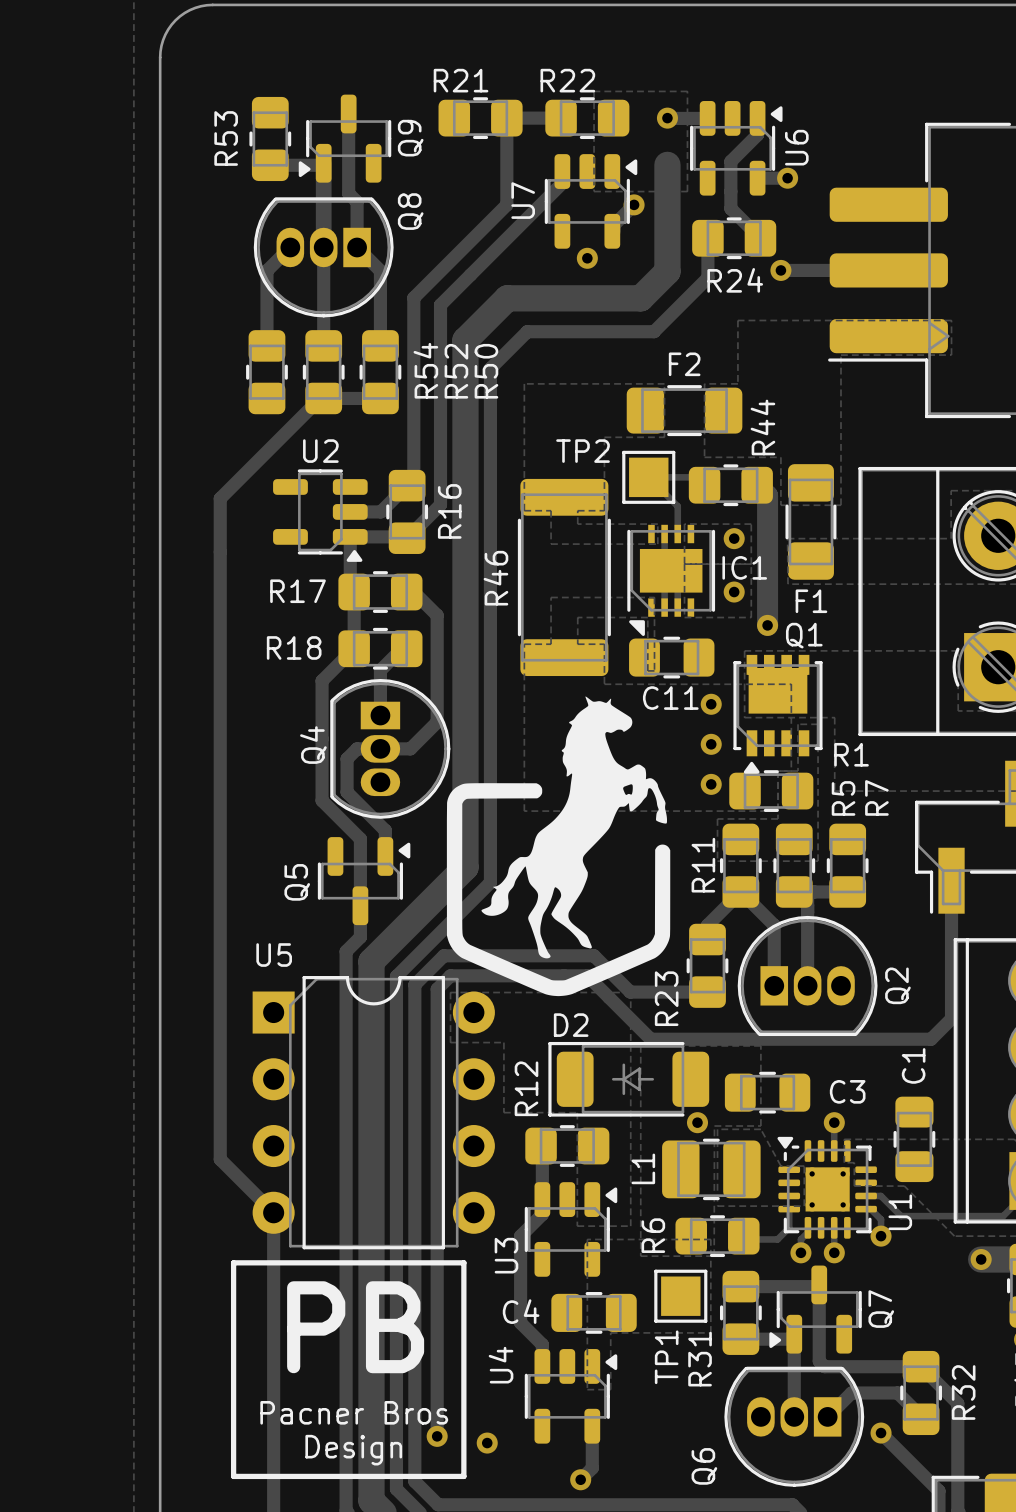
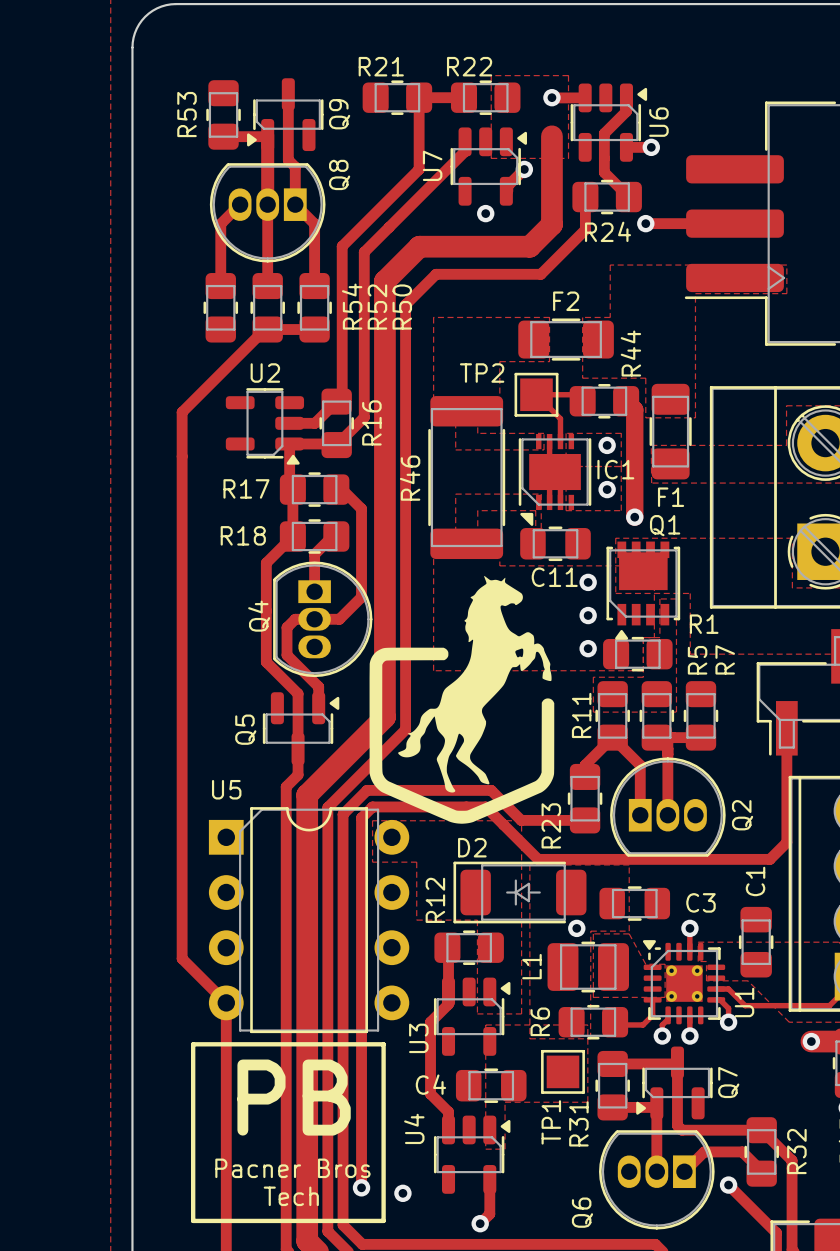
text: Design (353, 1450) -> Tech (291, 1196)

